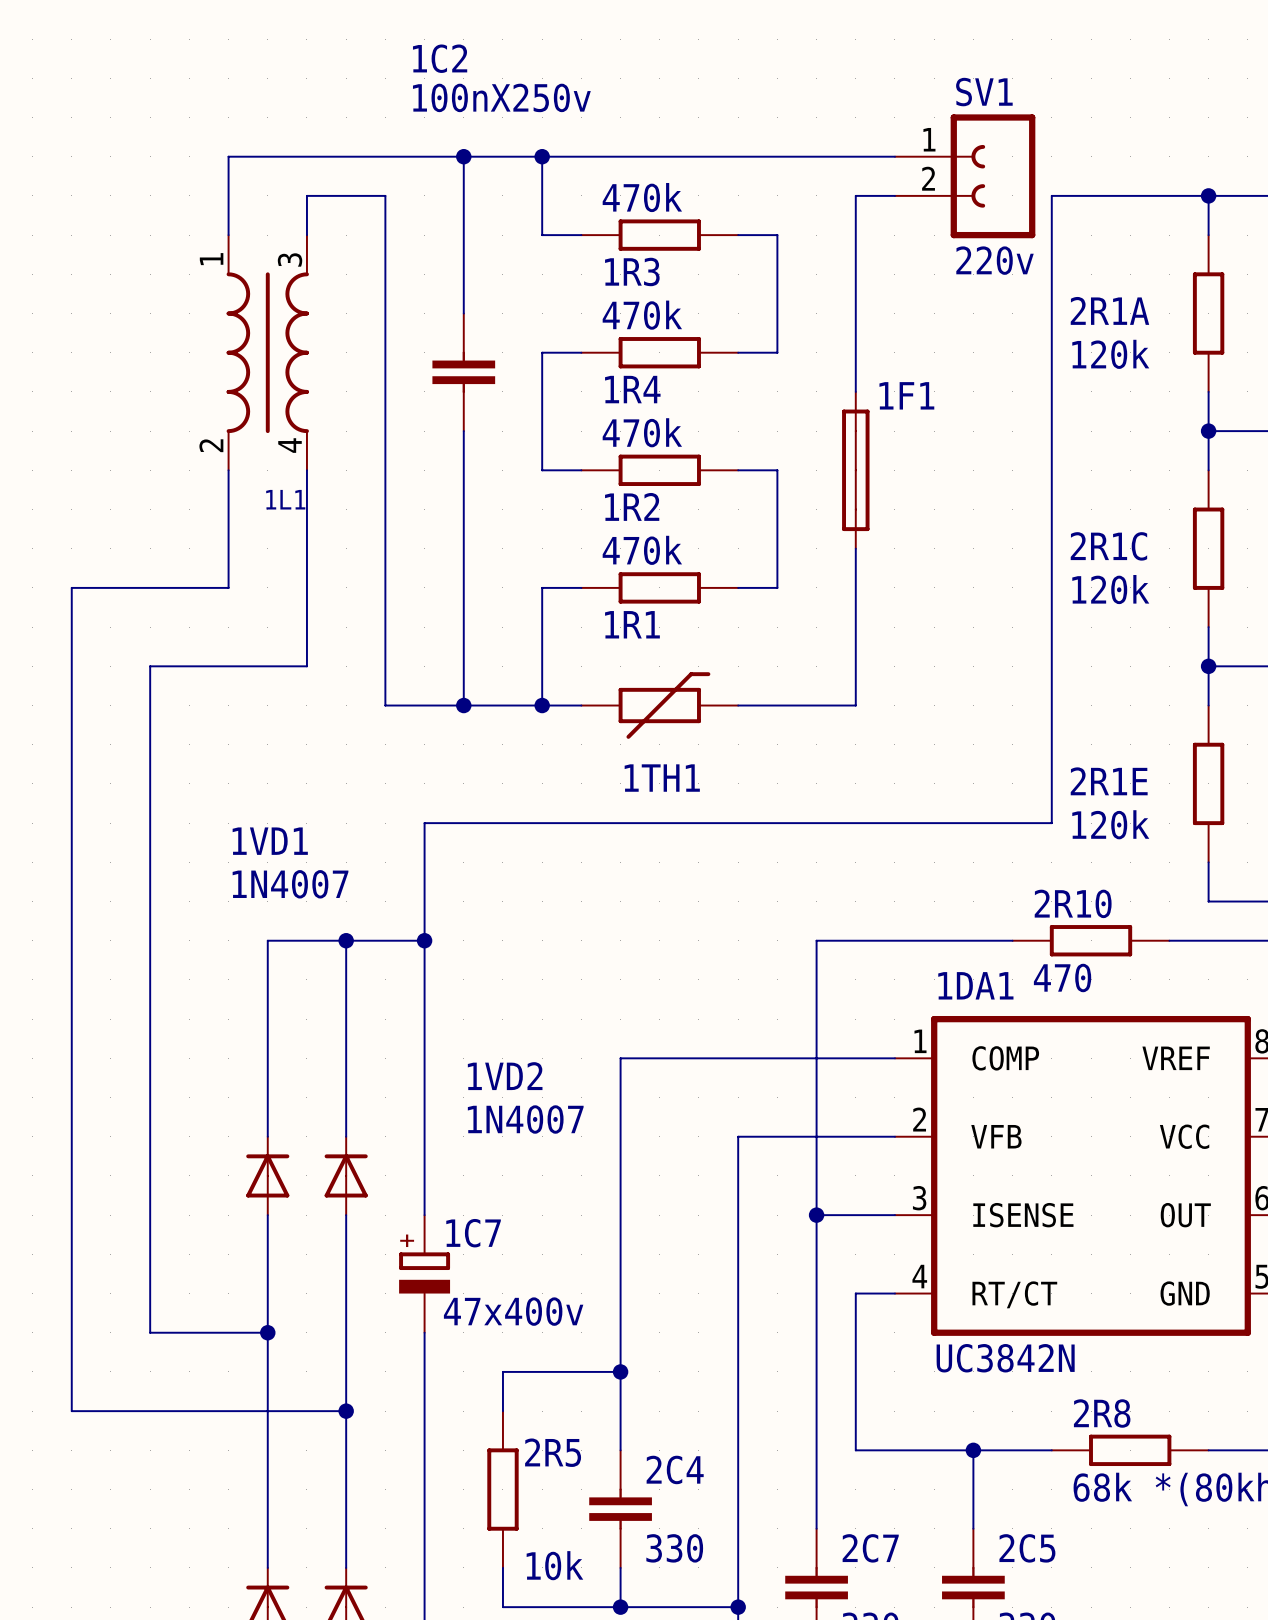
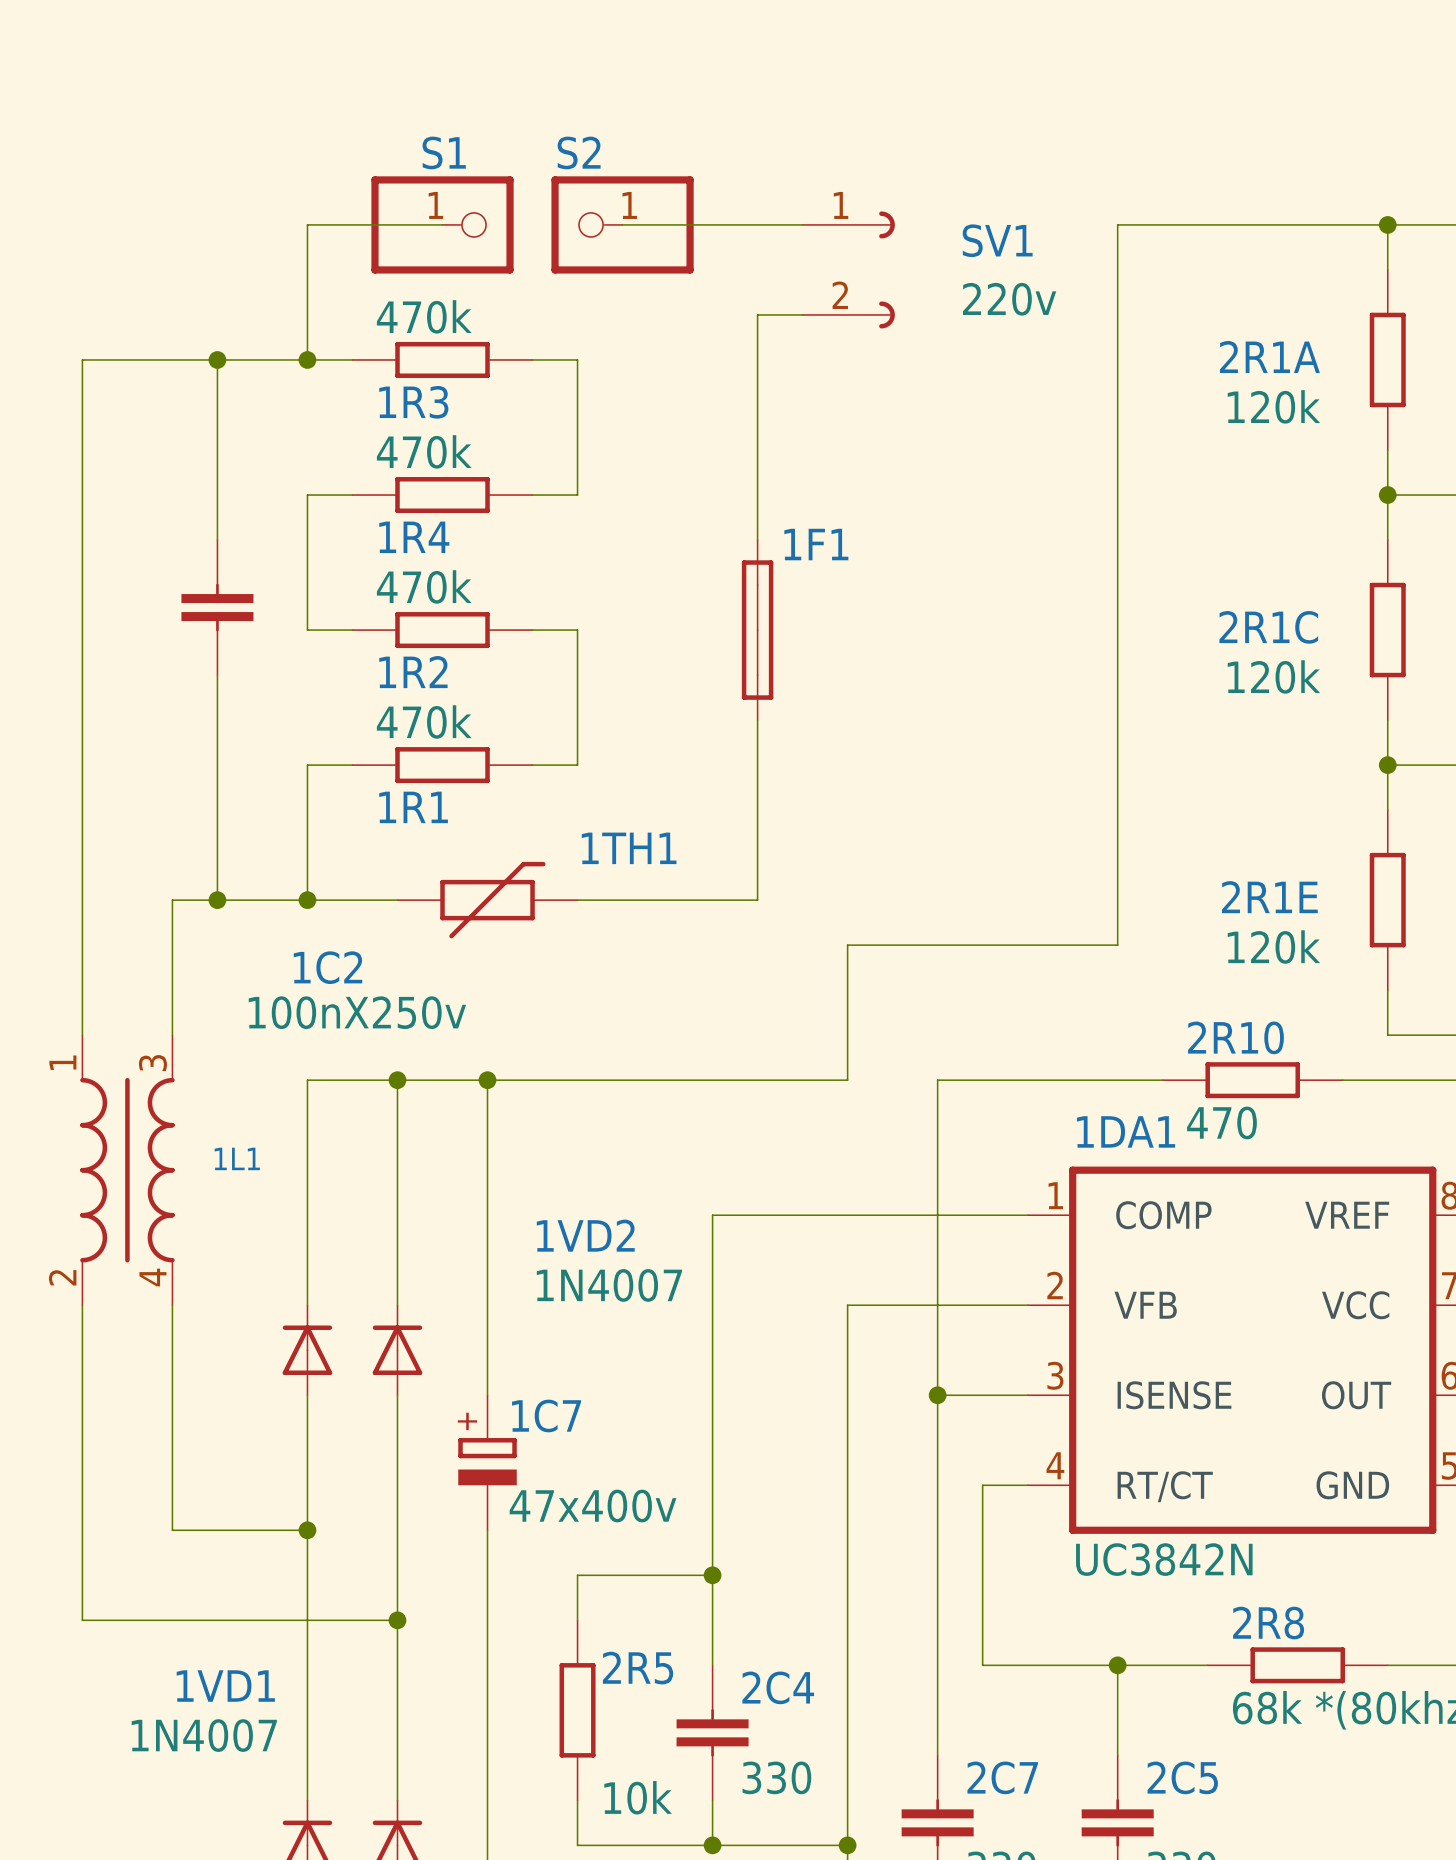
1C2 name position: 1C2 (440, 58) -> 1C2 (327, 967)
SV1 name position: SV1 (984, 92) -> SV1 (997, 240)
1C2 value position: 100nX250v (501, 97) -> 100nX250v (357, 1012)
SV1 symbol: [894, 114, 1036, 239] -> [802, 211, 895, 329]
wire: (463, 156) (463, 313) -> (532, 495) (577, 495) (577, 359) (532, 359)
junction: (463, 156) -> none
wire: (542, 156) (542, 235) (581, 235) -> none
junction: (542, 156) -> none
wire: (894, 156) (228, 156) (228, 235) -> none
wire: (306, 195) (306, 235) -> (352, 224) (307, 224) (307, 359)
wire: (385, 195) (385, 705) (581, 705) -> none
S1: none -> (442, 224)
wire: none -> (622, 224) (802, 224)
S2: none -> (622, 224)
wire: (894, 195) (855, 195) (855, 391) -> (802, 314) (757, 314) (757, 540)
wire: (1051, 195) (1051, 823) (973, 823) -> (1207, 224) (1117, 224) (1117, 945)
1R3 position: (659, 235) -> (442, 359)
wire: (738, 235) (777, 235) (777, 352) (738, 352) -> none
SV1 value position: 220v (995, 260) -> 220v (1009, 299)
wire: none -> (217, 359) (217, 540)
junction: none -> (217, 359)
junction: none -> (307, 359)
1L1 position: (267, 352) -> (127, 1170)
wire: (581, 352) (542, 352) (542, 470) (581, 470) -> (352, 495) (307, 495) (307, 630) (352, 630)
1R4 position: (659, 352) -> (442, 495)
1C2 position: (463, 372) -> (217, 607)
wire: (463, 431) (463, 705) -> none
wire: (228, 470) (228, 587) (71, 587) -> (352, 359) (82, 359) (82, 675)
wire: (306, 470) (306, 666) -> (217, 675) (217, 900)
1R2 position: (659, 470) -> (442, 630)
wire: (738, 470) (777, 470) (777, 587) (738, 587) -> (532, 630) (577, 630) (577, 765) (532, 765)
1F1 position: (855, 470) -> (757, 630)
1L1 name position: 1L1 (285, 499) -> 1L1 (237, 1158)
wire: (855, 548) (855, 705) (738, 705) -> none
wire: (581, 587) (542, 587) (542, 705) -> none
1R1 position: (659, 587) -> (442, 765)
wire: none -> (757, 720) (757, 900) (577, 900)
wire: (267, 666) (150, 666) (150, 783) -> (307, 765) (307, 900)
junction: (463, 705) -> none
junction: (542, 705) -> none
1TH1 position: (659, 705) -> (487, 900)
1TH1 name position: 1TH1 (662, 778) -> 1TH1 (629, 848)
wire: none -> (172, 900) (397, 900)
junction: none -> (217, 900)
junction: none -> (307, 900)
wire: (738, 823) (424, 823) (424, 940) -> (847, 945) (847, 1080) (487, 1080)
1VD1 name position: 1VD1 (270, 841) -> 1VD1 (225, 1686)
1VD1 value position: 1N4007 (290, 884) -> 1N4007 (204, 1735)
wire: (71, 901) (71, 1136) -> none
wire: (150, 901) (150, 1136) -> none

